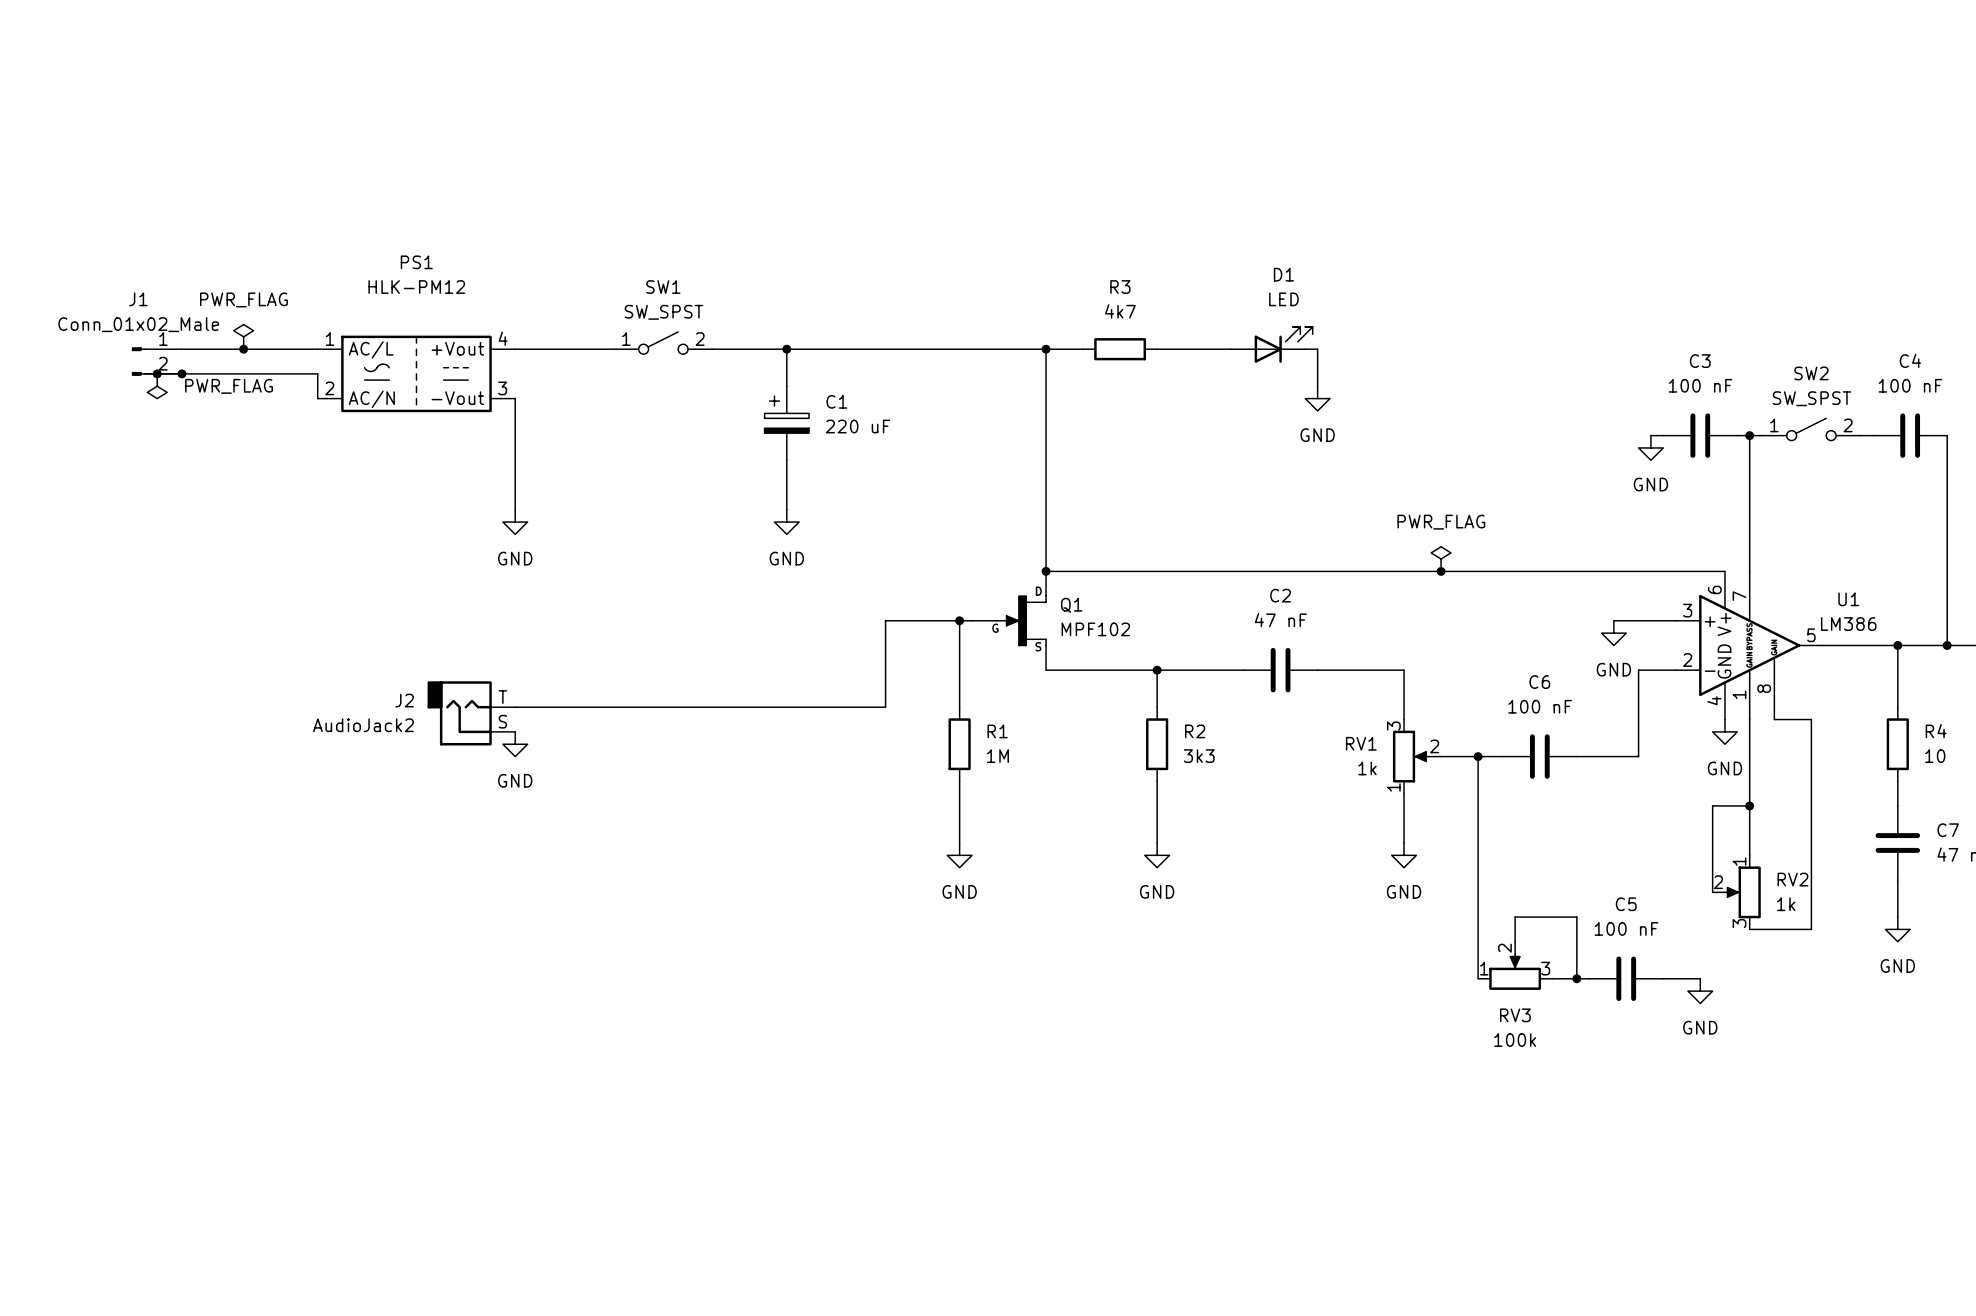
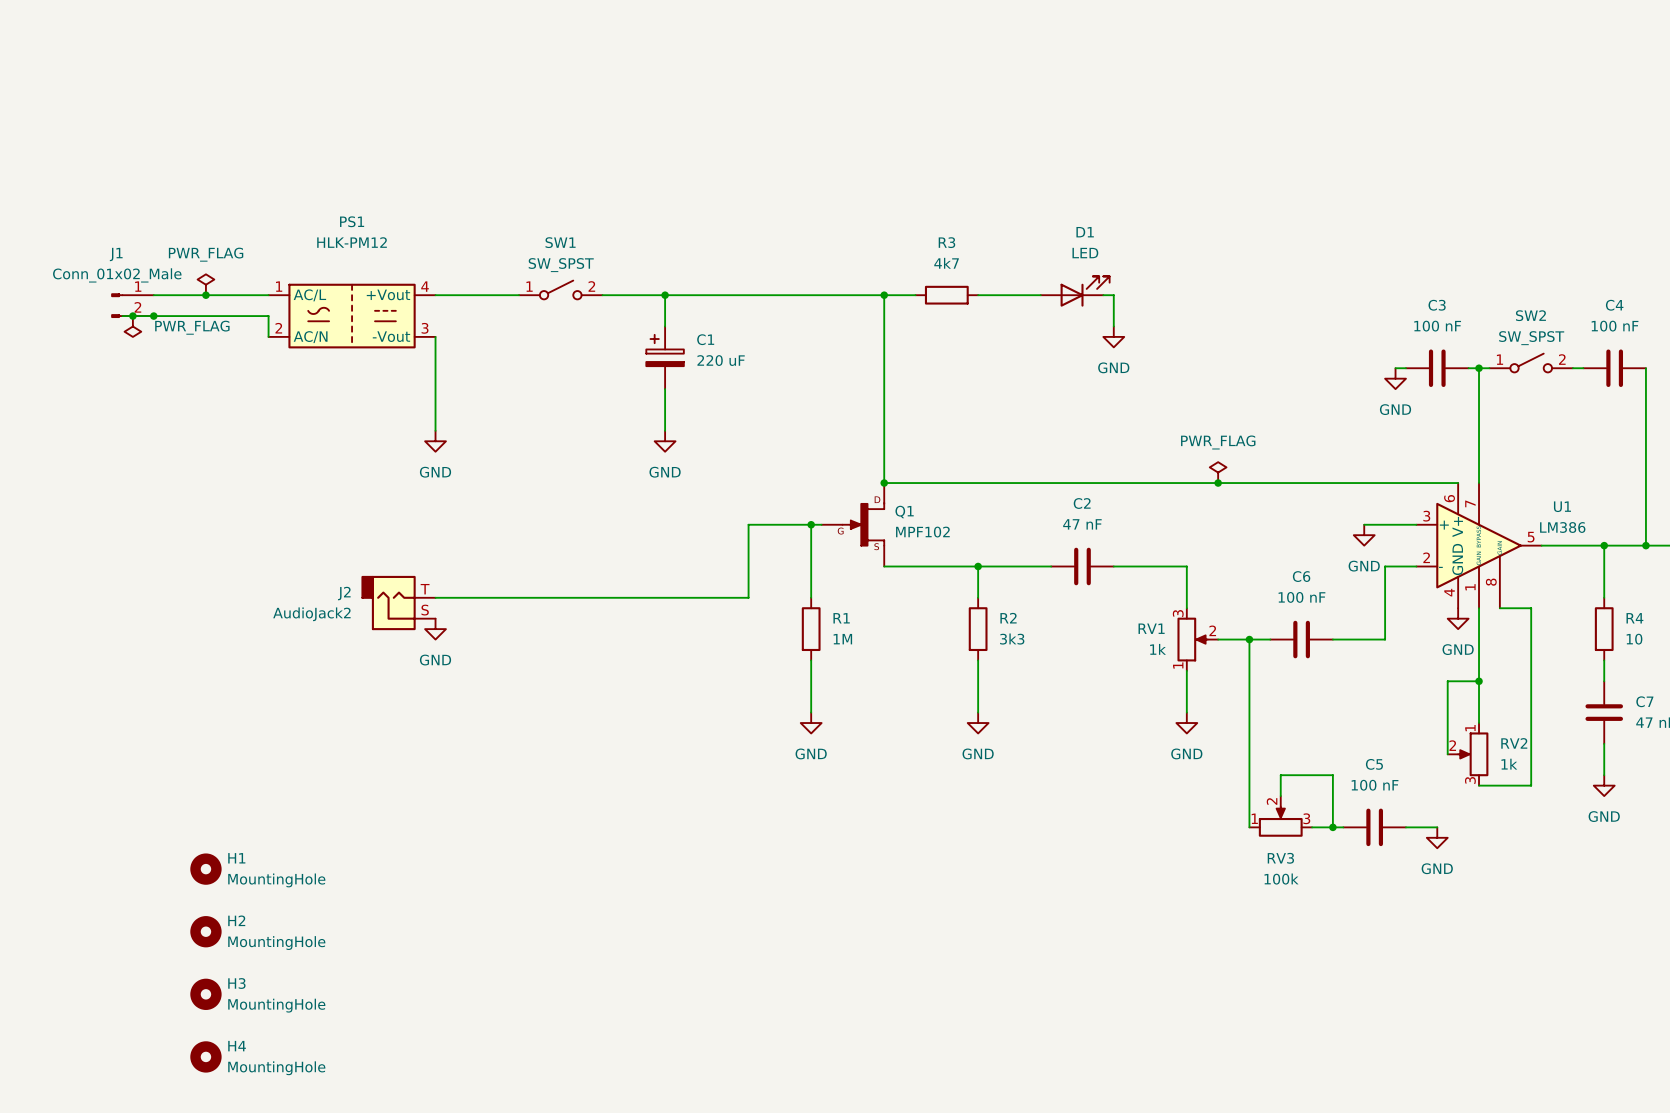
H1: none -> MountingHole (205, 869)
H2: none -> MountingHole (205, 931)
H3: none -> MountingHole (205, 994)
H4: none -> MountingHole (205, 1056)

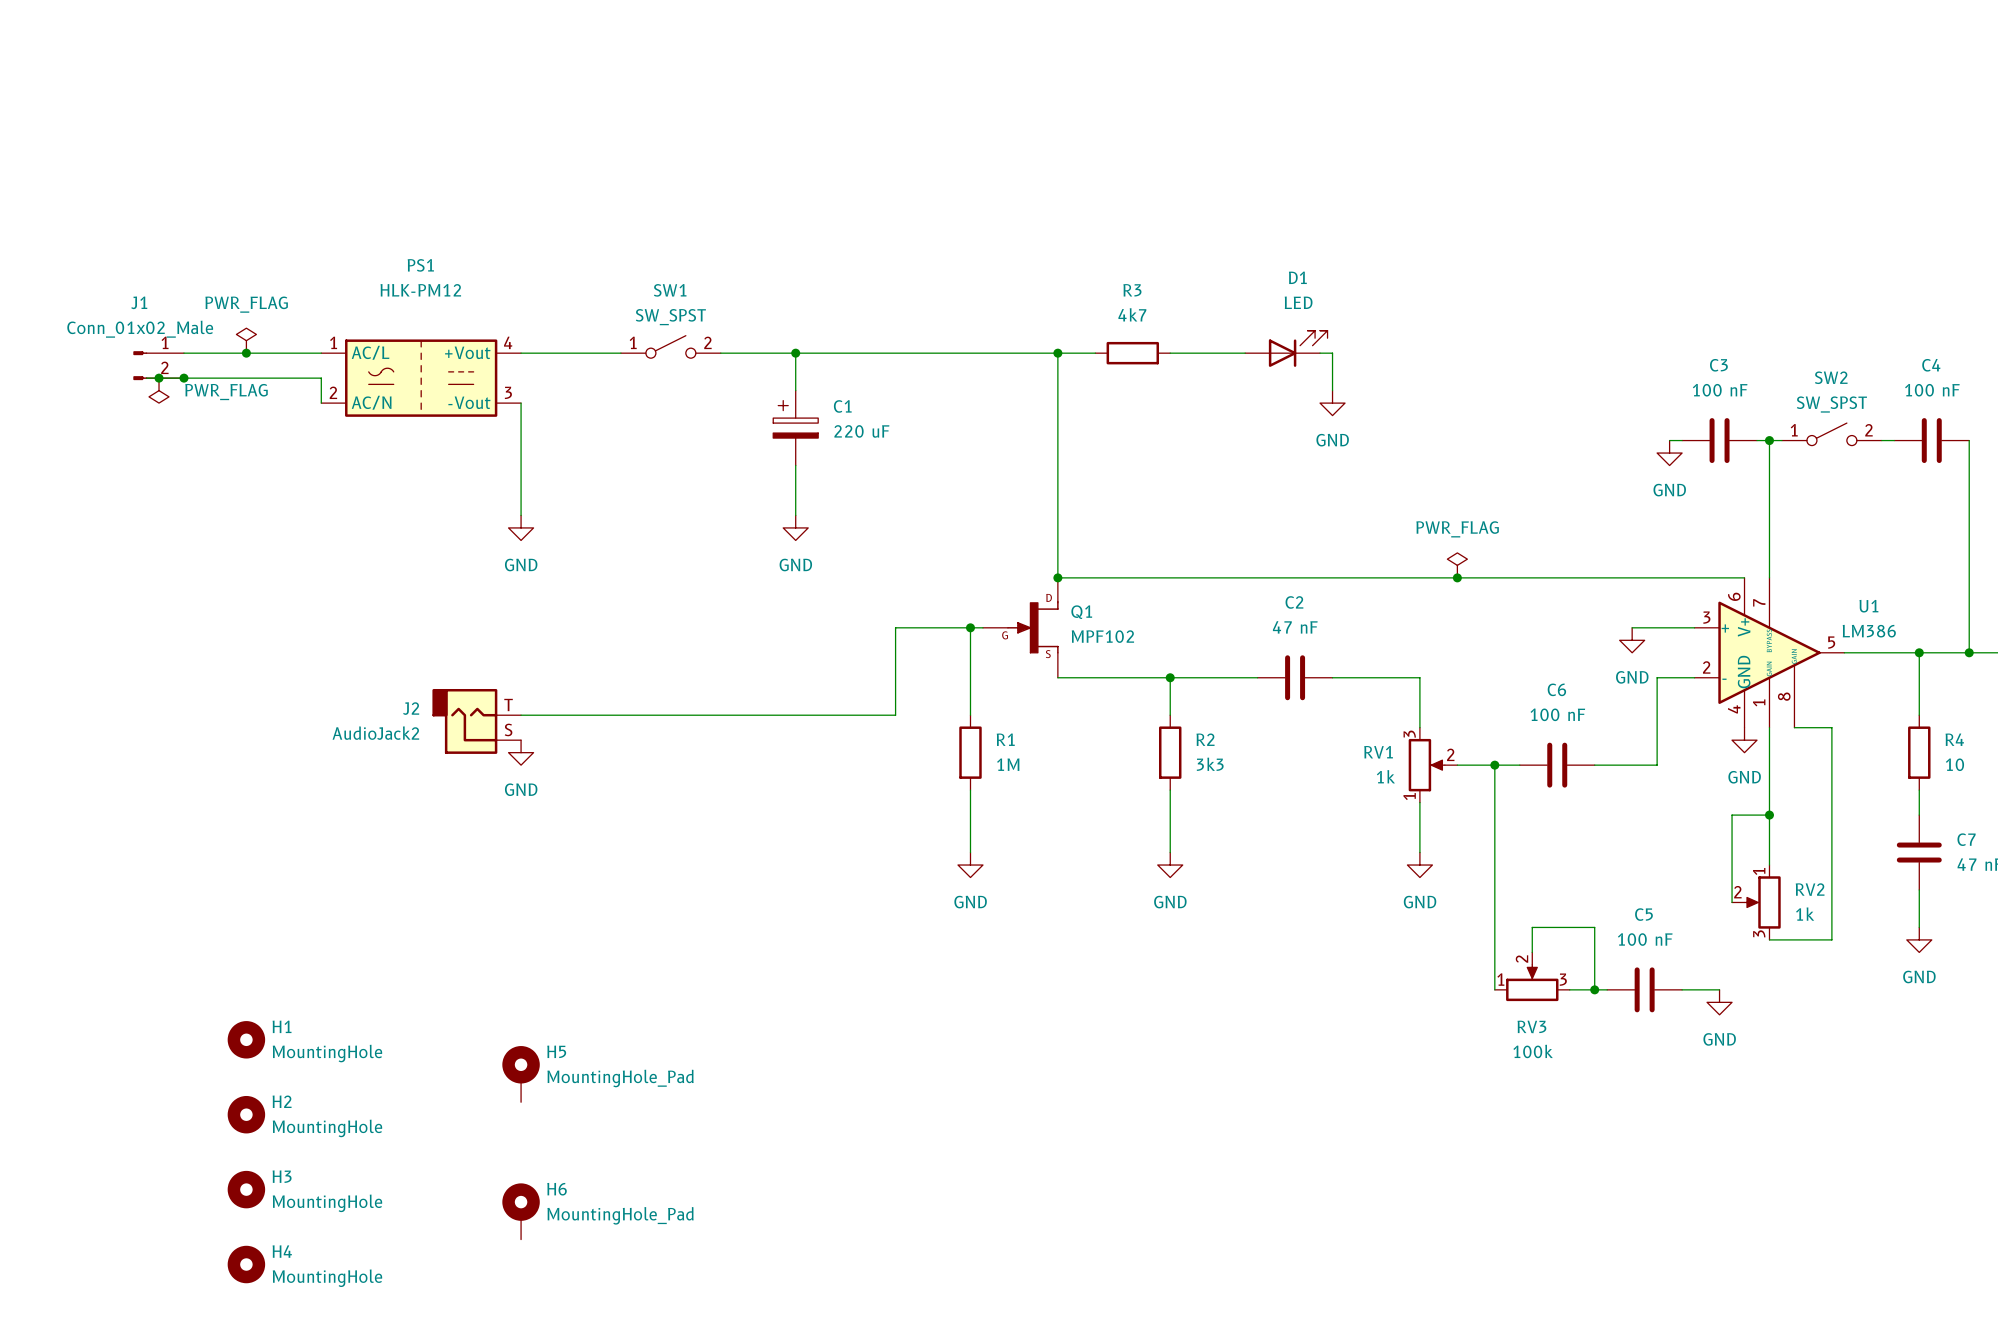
H5: none -> MountingHole_Pad (521, 1074)
H6: none -> MountingHole_Pad (521, 1211)

